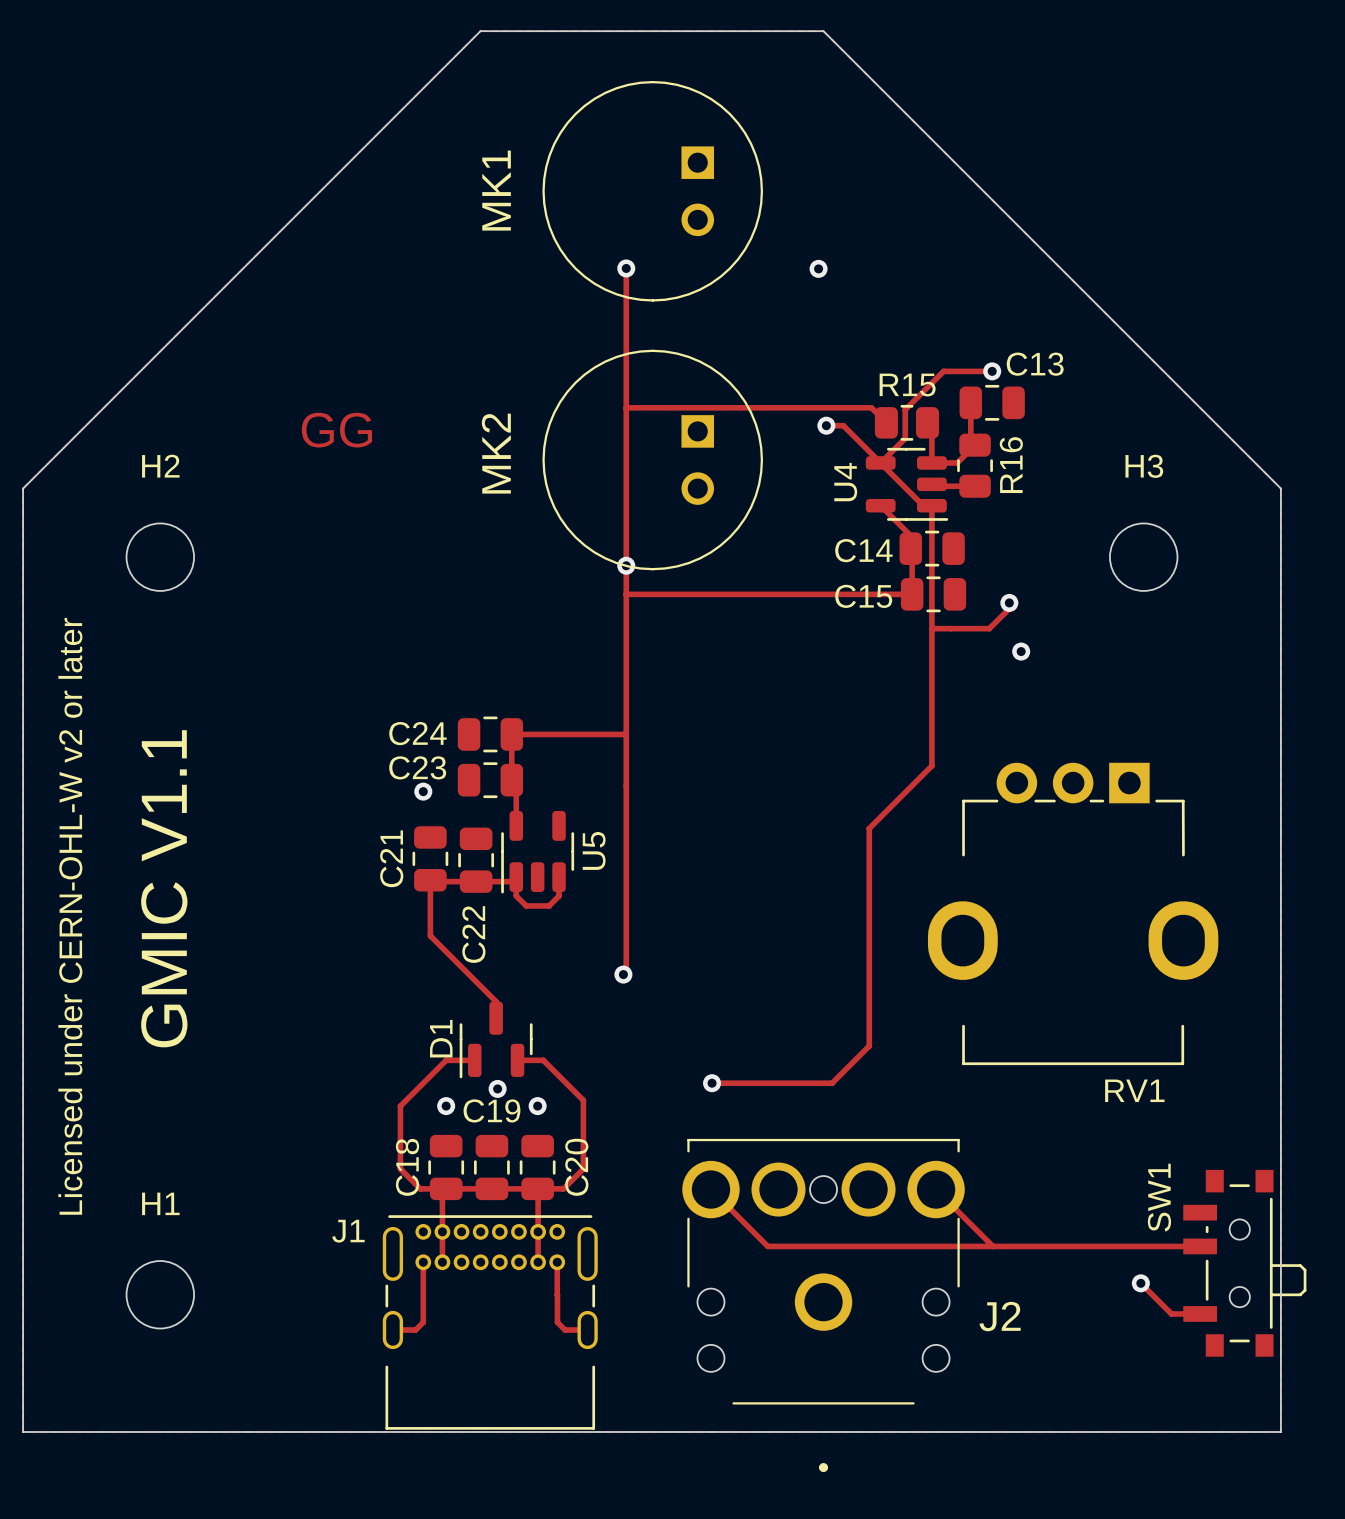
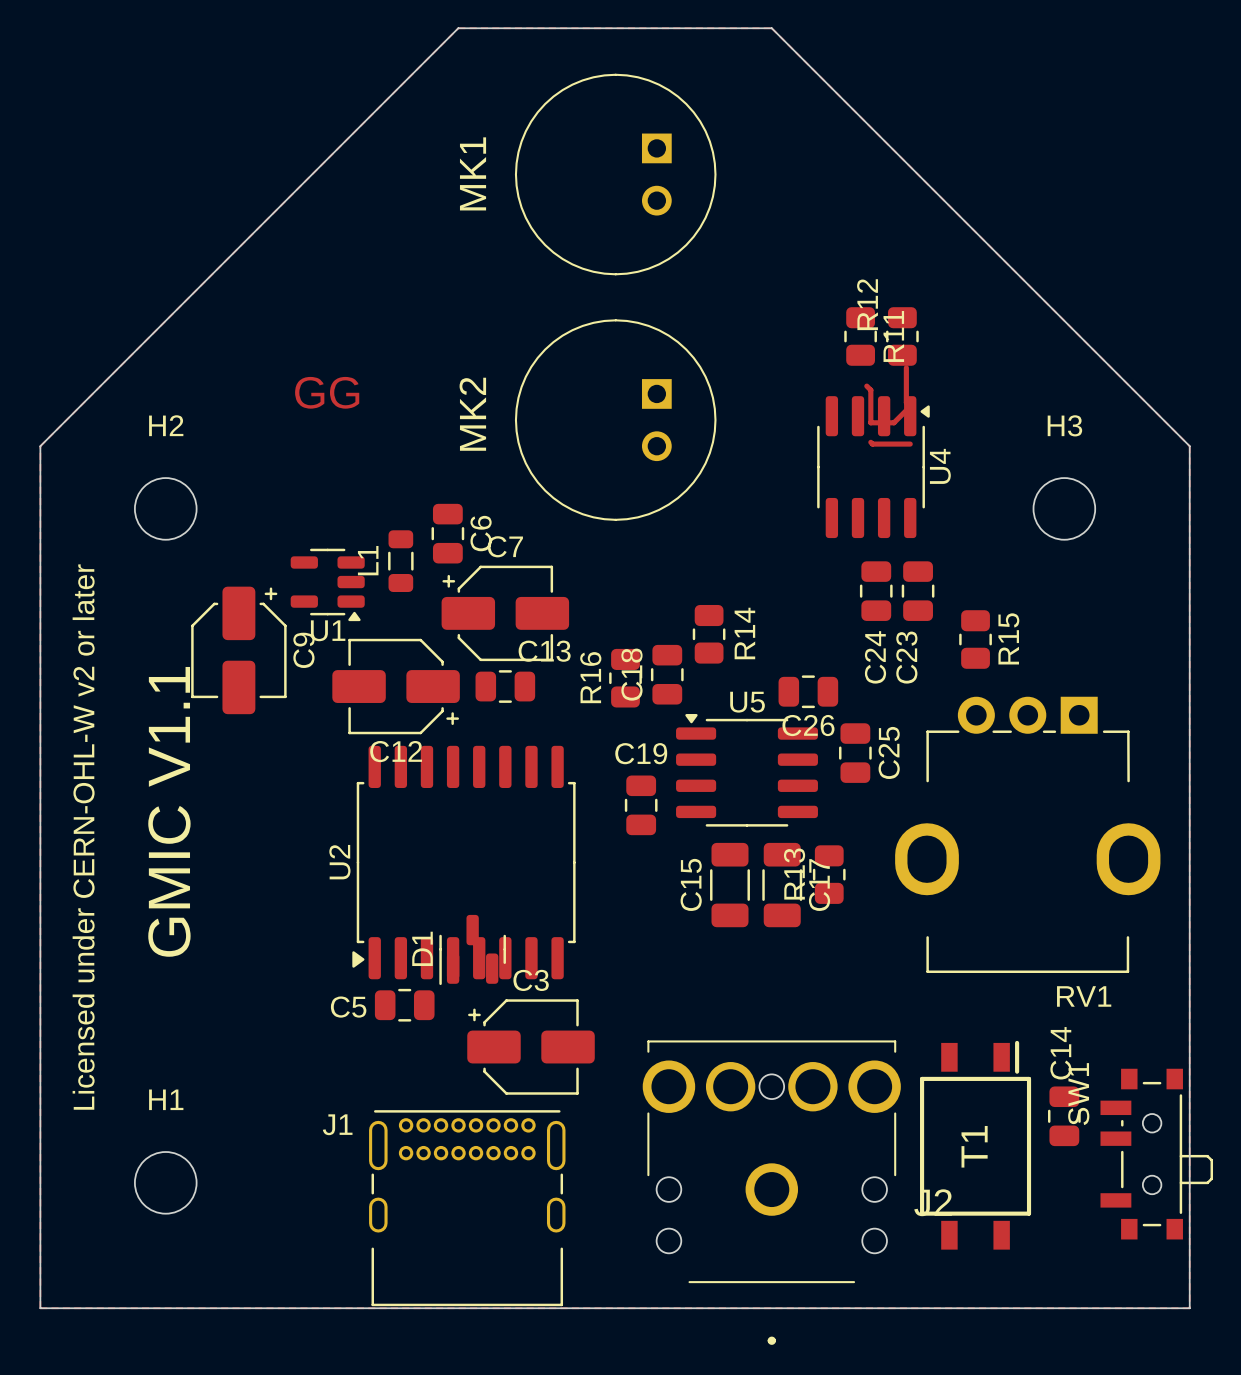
track: (626, 268) (626, 971) (623, 974) -> none
via: (626, 268) -> none
via: (818, 268) -> none
R11: none -> (860, 336)
R12: none -> (902, 336)
track: (992, 371) (943, 371) (905, 409) (905, 438) (880, 462) -> none
via: (992, 371) -> none
C13 position: (992, 402) -> (505, 686)
track: (626, 408) (871, 407) (886, 422) -> none
R15 rotation: 0° (906, 422) -> 90° clockwise (975, 639)
R15 position: (906, 422) -> (975, 639)
track: (826, 425) (843, 425) (923, 505) (931, 505) (931, 765) (869, 828) (869, 1046) (832, 1083) (712, 1083) -> none
via: (826, 425) -> none
U4 footprint: [865, 447, 949, 521] -> [817, 396, 930, 539]
R16 position: (975, 465) -> (625, 678)
R16 name position: R16 (1011, 465) -> R16 (590, 677)
U4 name position: U4 (845, 482) -> U4 (940, 466)
track: (880, 505) (910, 535) (912, 594) (626, 594) -> none
C14 rotation: 0° (932, 548) -> 90° clockwise (1064, 1116)
C14 position: (932, 548) -> (1064, 1116)
via: (626, 565) -> none
C15 footprint: [900, 576, 967, 613] -> [710, 842, 750, 928]
C6: none -> (447, 533)
track: (1009, 602) (1009, 608) (989, 628) (931, 628) -> none
via: (1009, 602) -> none
L1: none -> (400, 561)
U1: none -> (327, 584)
via: (1021, 651) -> none
C7: none -> (505, 613)
R14: none -> (709, 634)
C9: none -> (238, 650)
C24 name position: C24 (417, 733) -> C24 (875, 657)
C24 rotation: 0° (490, 734) -> 90° clockwise (876, 591)
C24 position: (490, 734) -> (876, 591)
track: (626, 734) (511, 734) (511, 780) (516, 784) (516, 825) -> none
C12: none -> (396, 686)
C26: none -> (808, 691)
C23 name position: C23 (417, 767) -> C23 (906, 657)
C23 rotation: 0° (490, 780) -> 90° clockwise (918, 591)
C23 position: (490, 780) -> (918, 591)
via: (423, 791) -> none
U5 footprint: [501, 811, 575, 894] -> [676, 714, 818, 827]
C25: none -> (855, 753)
U5 name position: U5 (594, 850) -> U5 (747, 702)
C21: (430, 858) -> none
C22: (476, 860) -> none
track: (559, 877) (559, 896) (549, 905) (526, 905) (516, 896) (516, 877) (511, 881) (430, 880) (430, 935) (496, 1001) (496, 1018) -> none
RV1 position: (1073, 913) -> (1027, 834)
U2: none -> (463, 862)
R13: none -> (829, 874)
C17: none -> (782, 885)
via: (623, 974) -> none
track: (474, 1060) (446, 1060) (400, 1106) (400, 1168) (420, 1188) (563, 1188) (583, 1168) (583, 1100) (543, 1060) (517, 1060) -> none
via: (712, 1083) -> none
via: (497, 1088) -> none
C5: none -> (404, 1005)
via: (446, 1106) -> none
via: (537, 1106) -> none
C3: none -> (531, 1047)
C18 position: (446, 1167) -> (667, 674)
C19 position: (491, 1167) -> (641, 805)
C20: (537, 1167) -> none
track: (446, 1188) (442, 1192) (442, 1262) -> none
track: (537, 1188) (538, 1262) -> none
track: (710, 1189) (767, 1246) (1200, 1246) -> none
track: (936, 1189) (992, 1246) -> none
T1: none -> (975, 1145)
track: (423, 1262) (423, 1322) (415, 1330) (392, 1330) -> none
track: (557, 1262) (557, 1295) -> none
track: (1140, 1283) (1171, 1313) (1200, 1313) -> none
via: (1140, 1283) -> none
track: (557, 1295) (557, 1322) (565, 1330) (587, 1330) -> none

